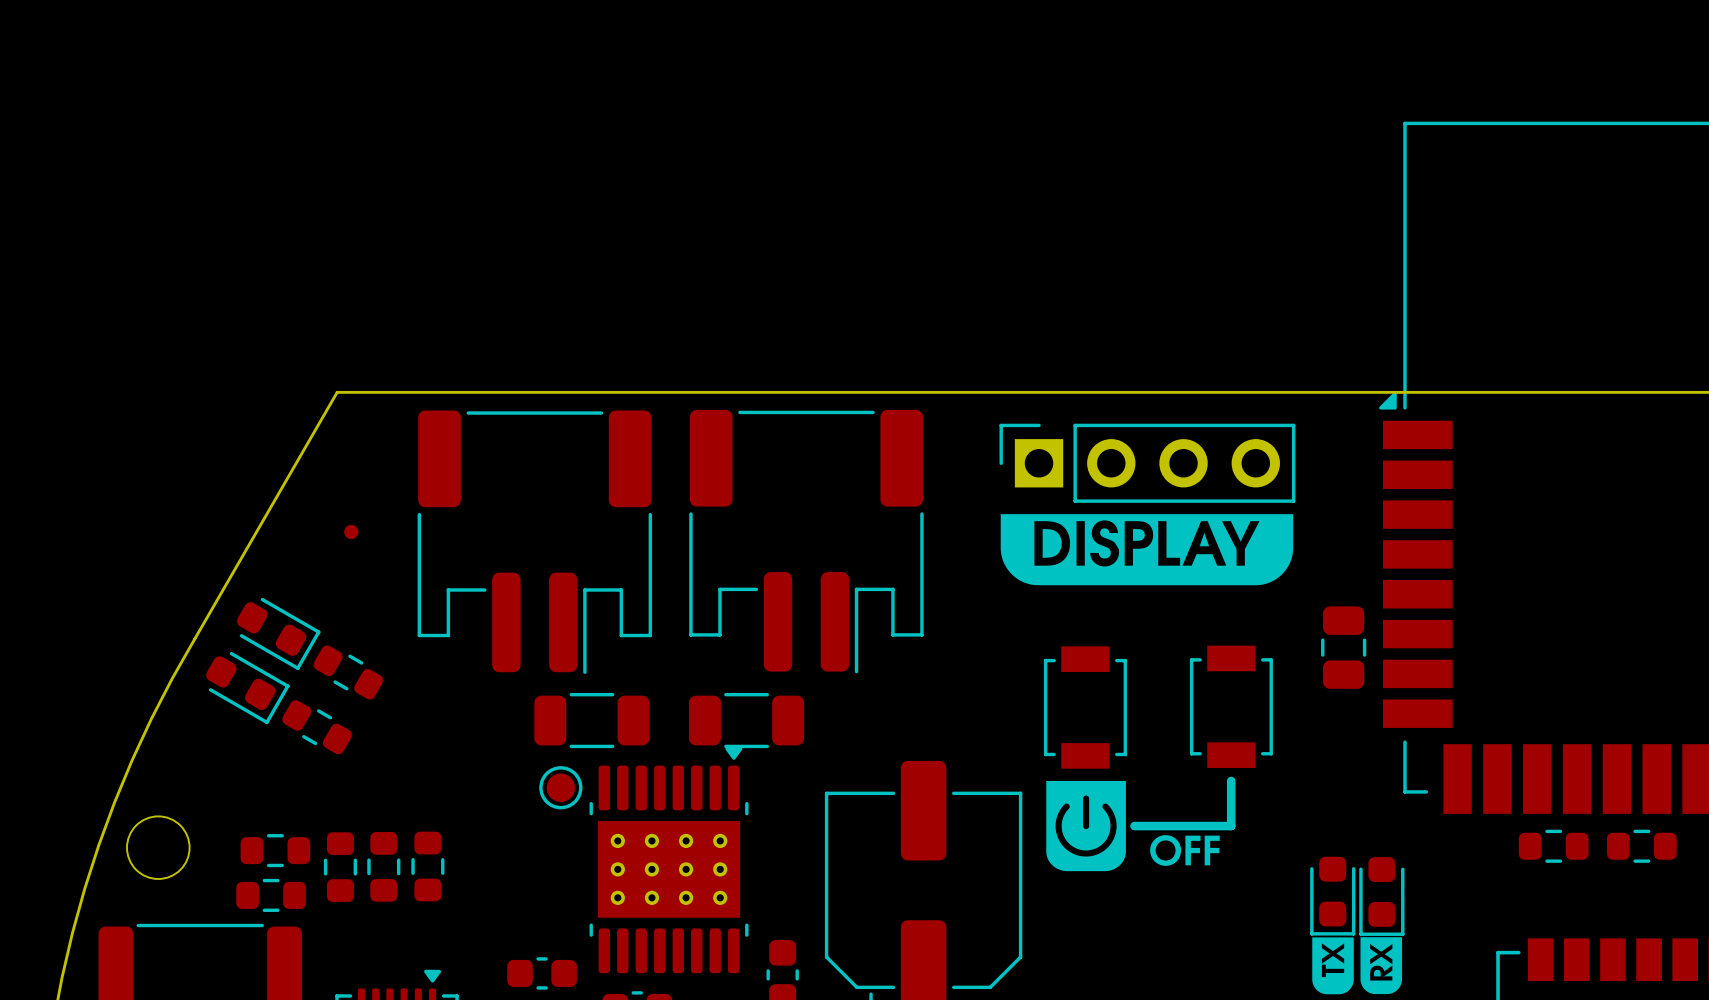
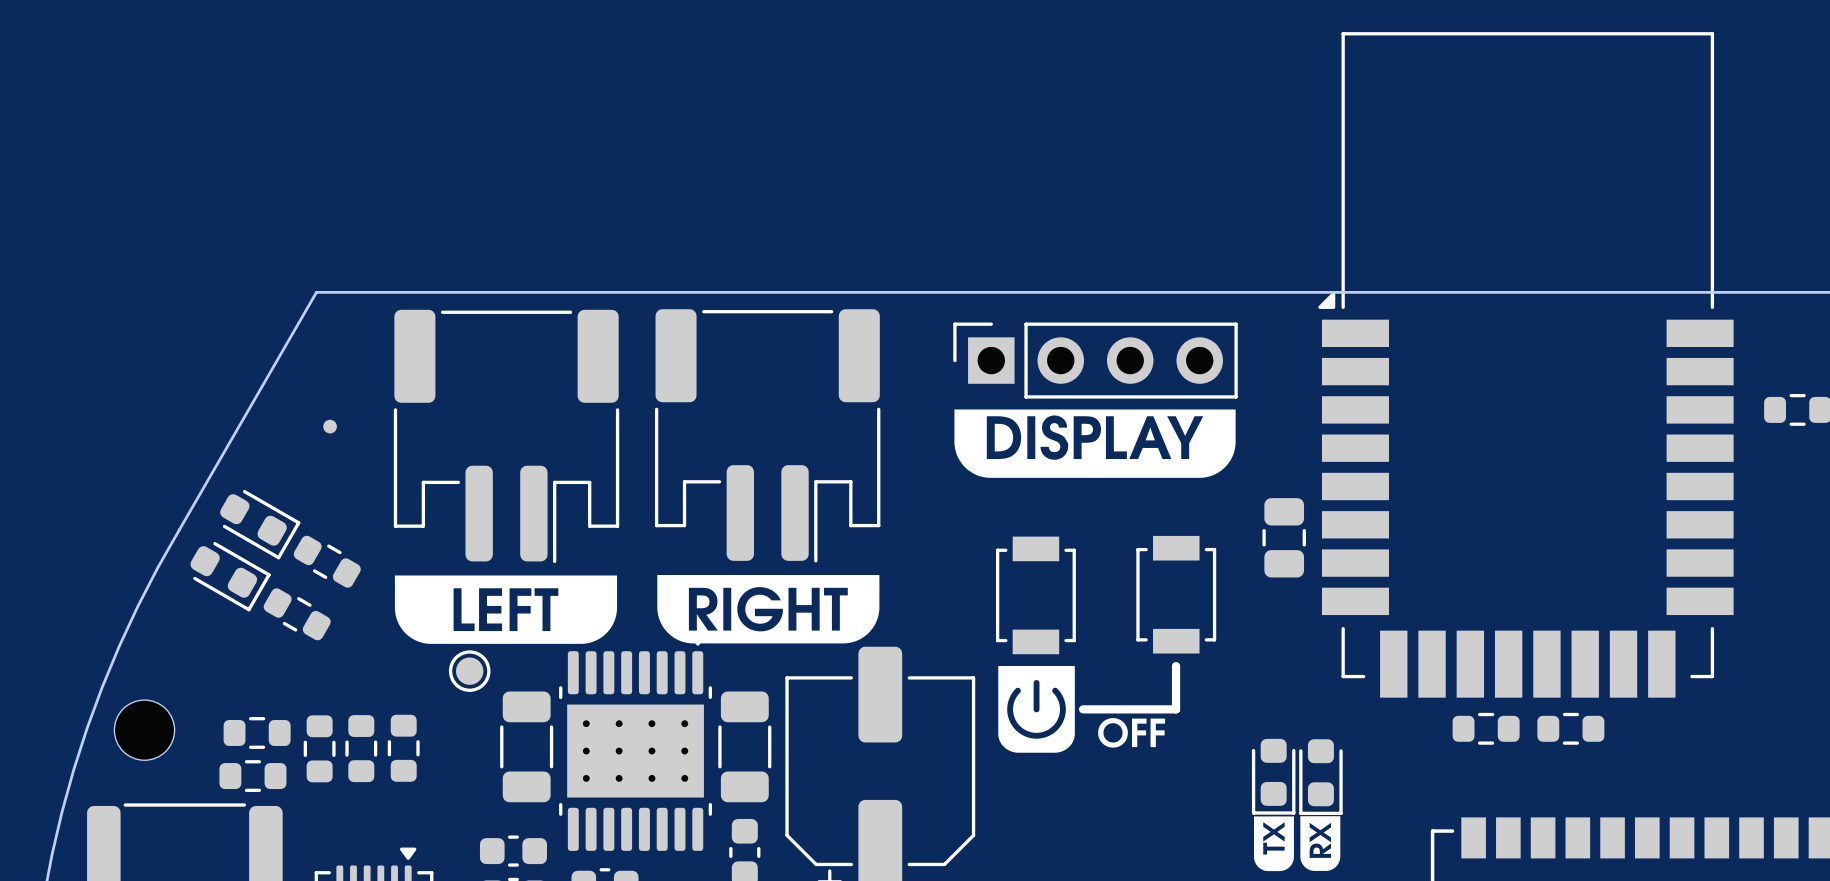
drawing: none -> [394, 575, 618, 644]
drawing: none -> [657, 575, 880, 644]
part: (591, 720) -> none
part: (746, 720) -> none
part position: (560, 787) -> (469, 671)
part: none -> (526, 746)
part: none -> (744, 746)

